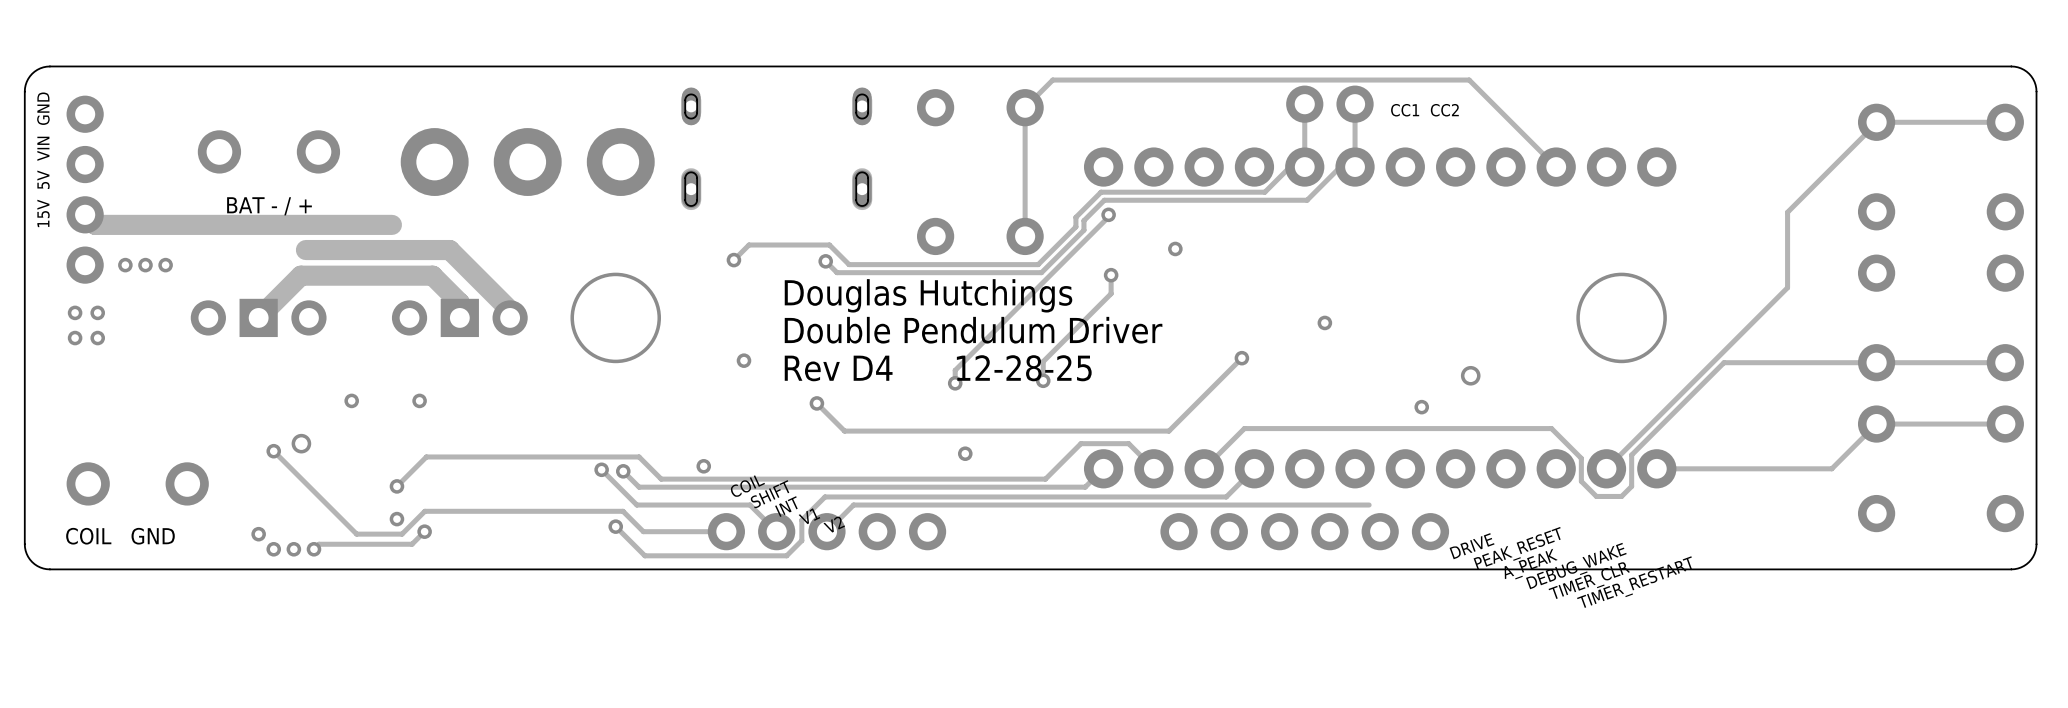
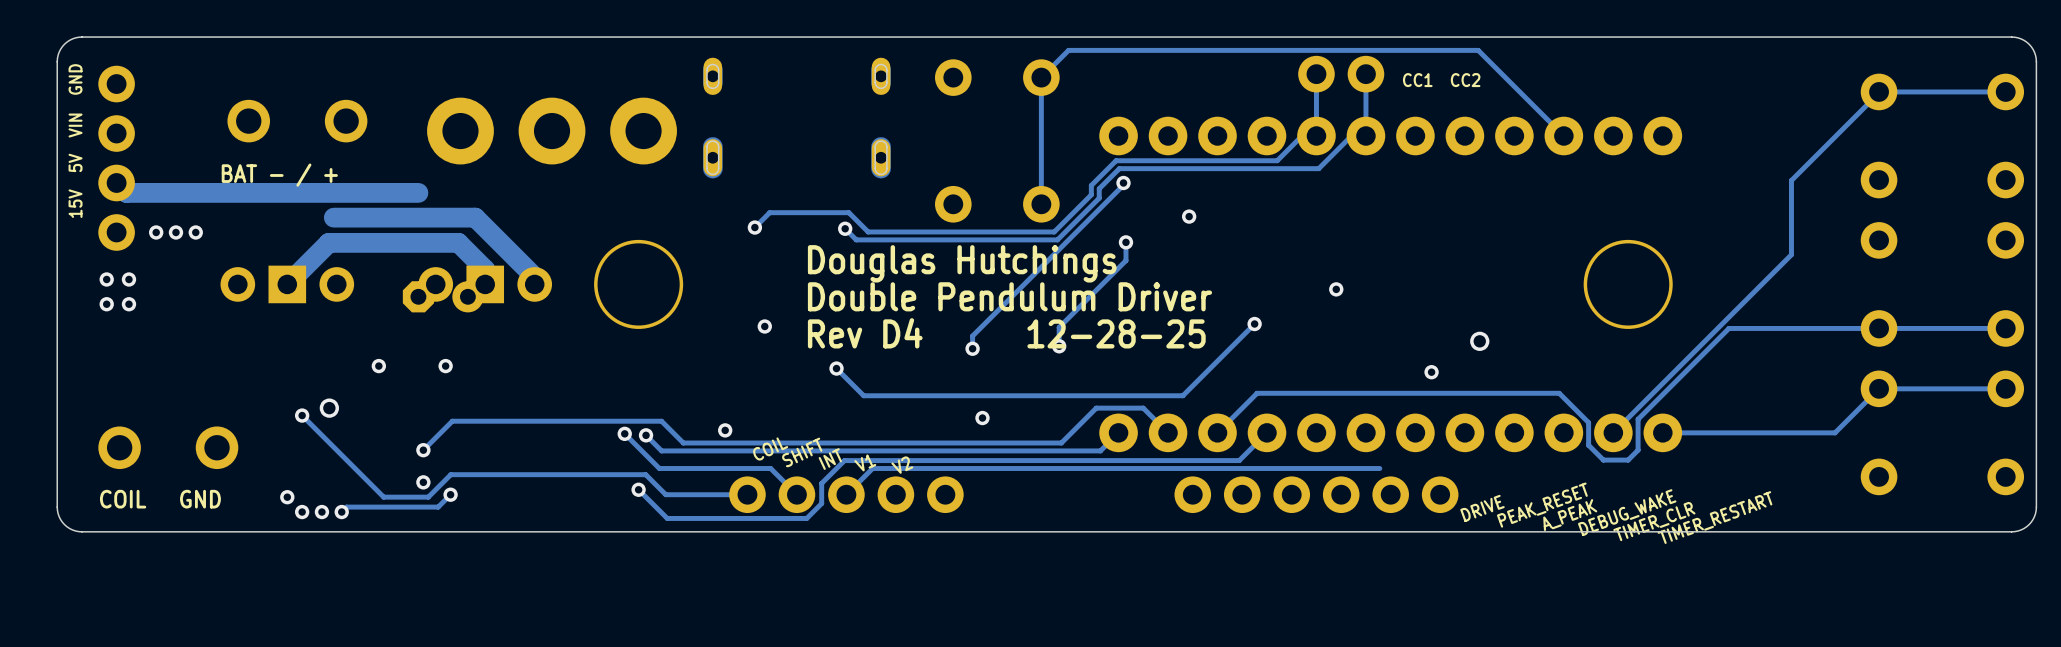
part: none -> (443, 296)

